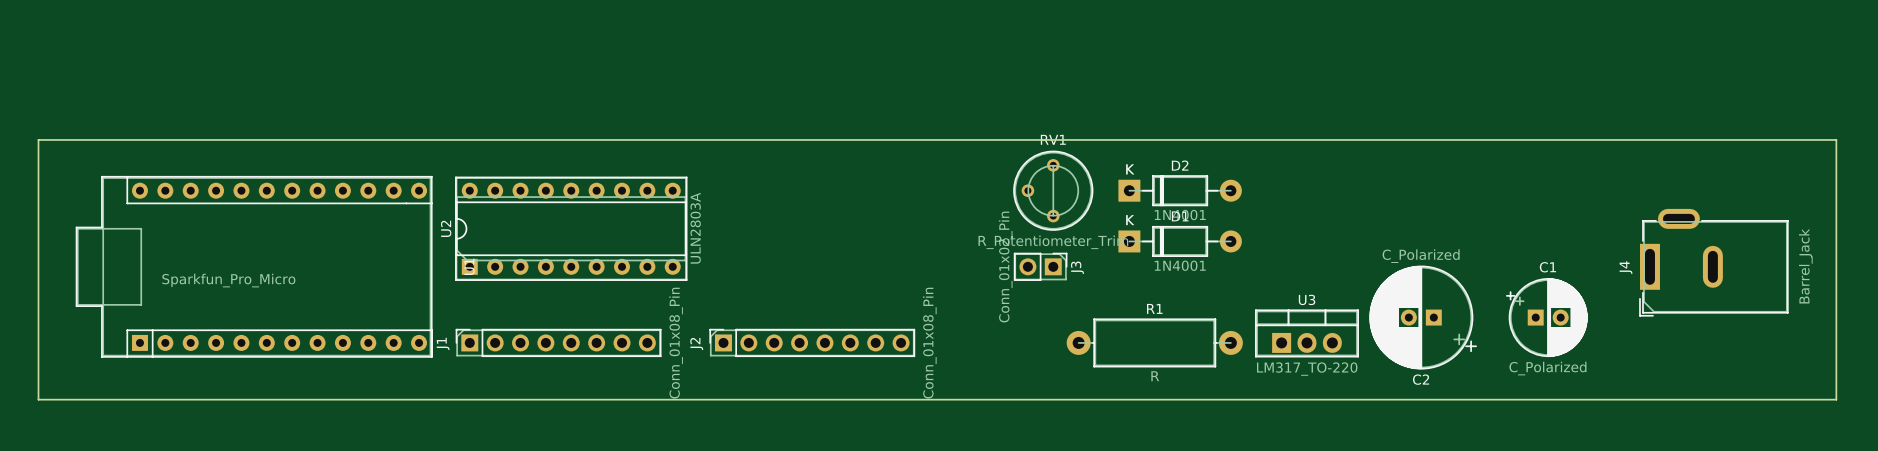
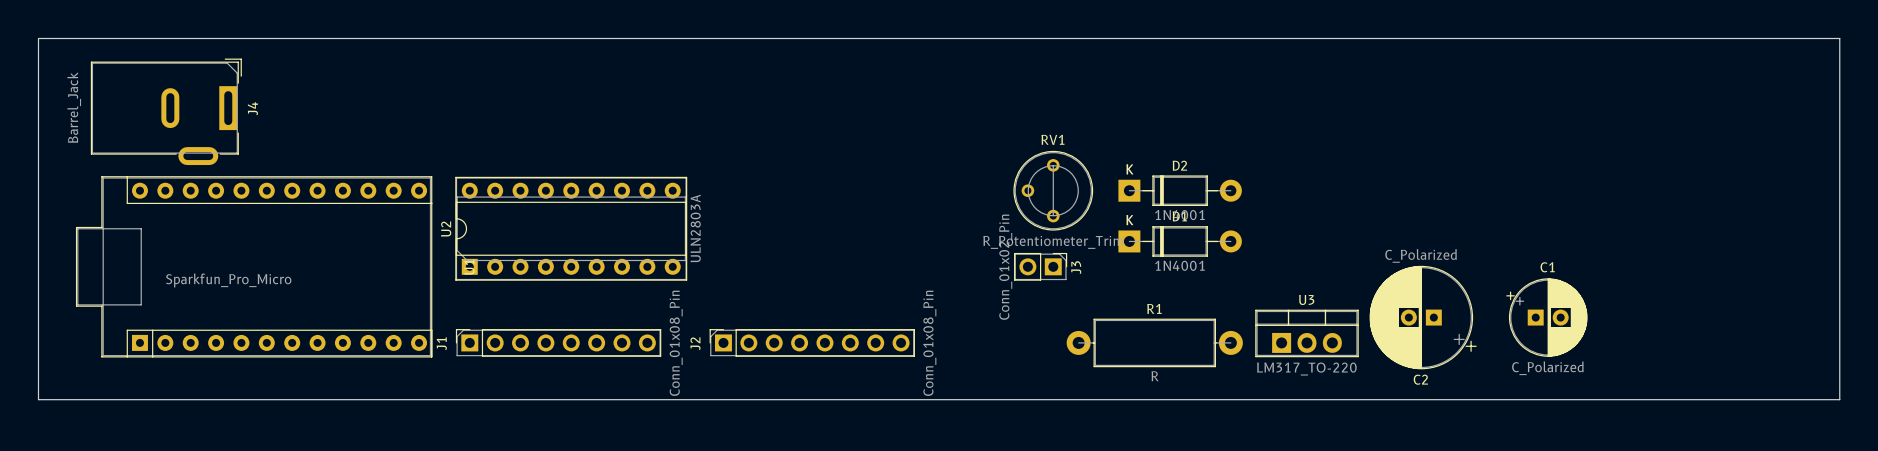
board edge: (38, 139) (1836, 139) (1836, 399) -> (38, 139) (38, 38) (1839, 38) (1839, 399) (1836, 399)
J4 footprint: [1639, 208, 1789, 317] -> [90, 58, 242, 166]
J4 value position: Barrel_Jack (1805, 266) -> Barrel_Jack (74, 107)
J4 name position: J4 (1626, 267) -> J4 (252, 108)

